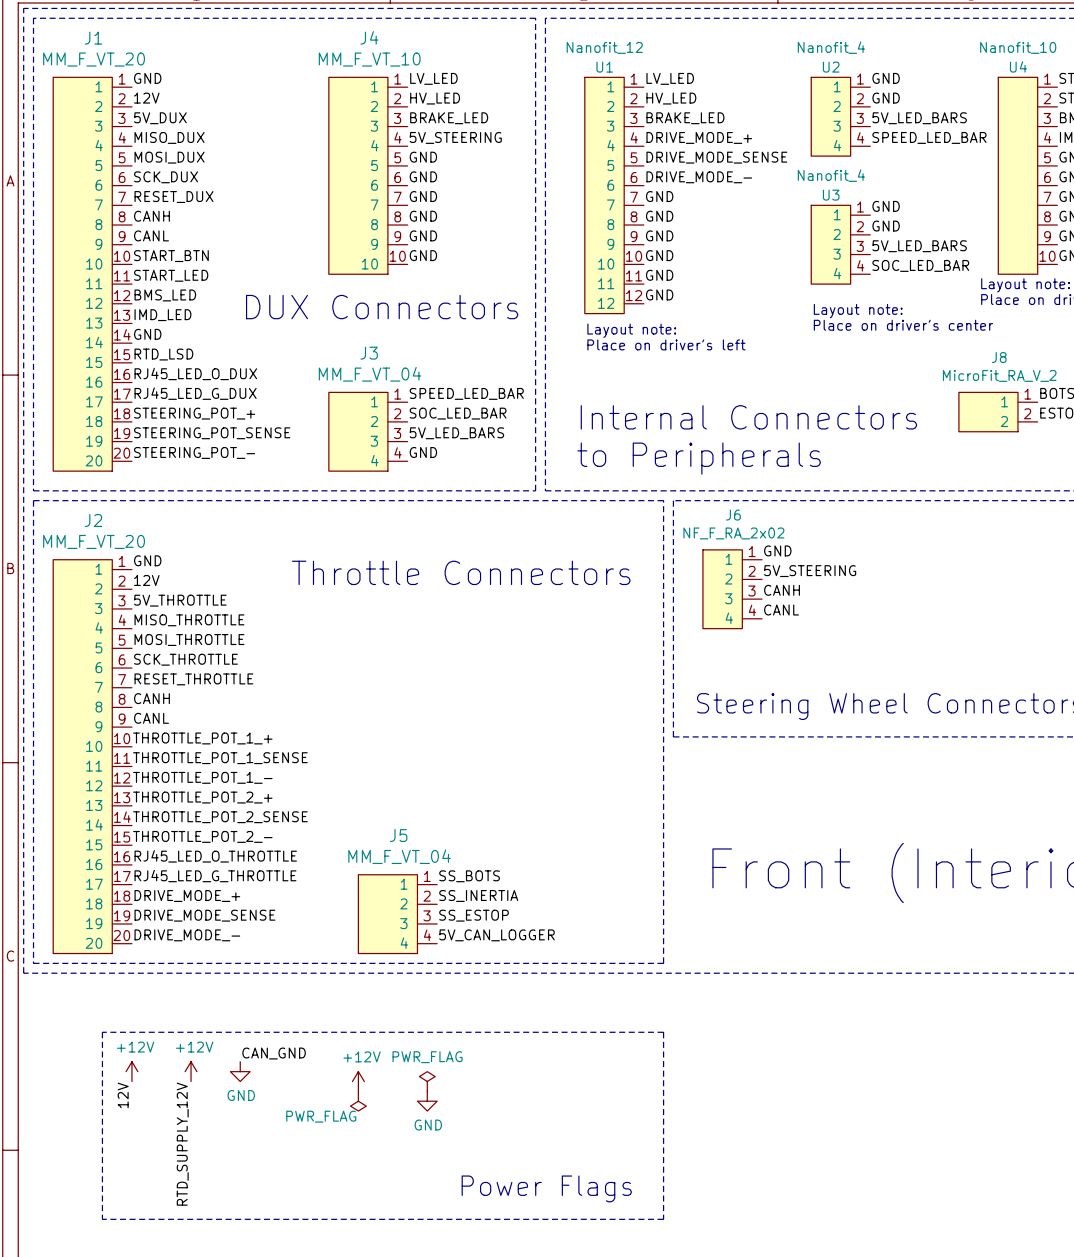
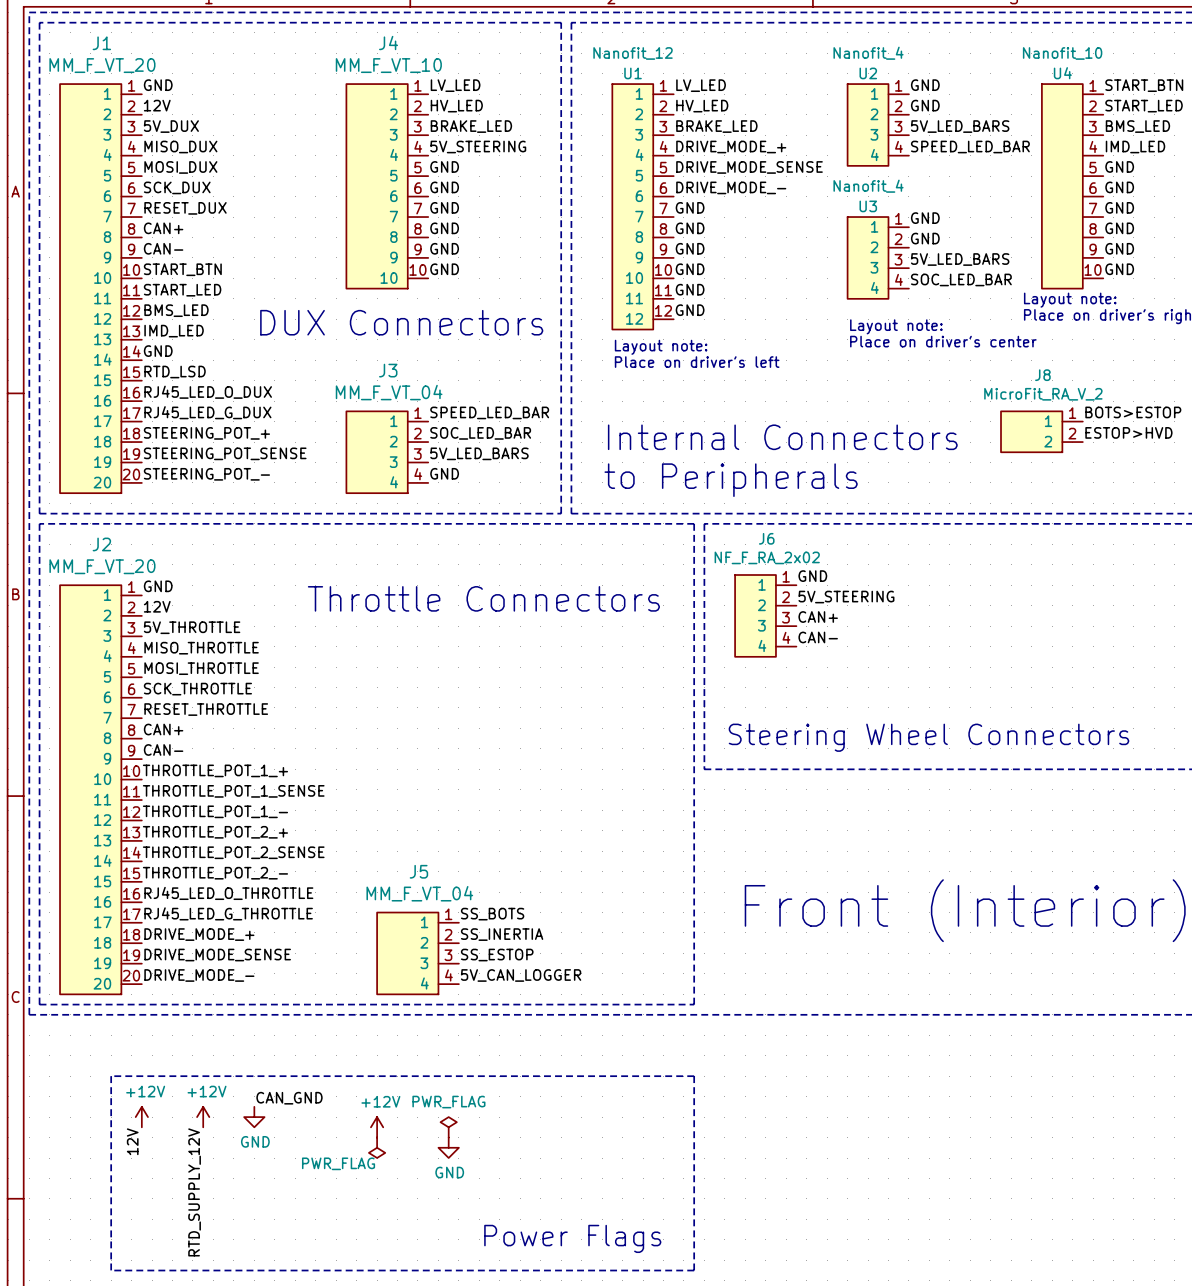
label: CANH (151, 216) -> CAN+ (163, 228)
label: CANL (151, 235) -> CAN- (163, 248)
label: CANH (782, 590) -> CAN+ (818, 617)
label: CANL (781, 610) -> CAN- (818, 637)
label: CANH (151, 698) -> CAN+ (163, 729)
label: CANL (151, 718) -> CAN- (163, 749)

